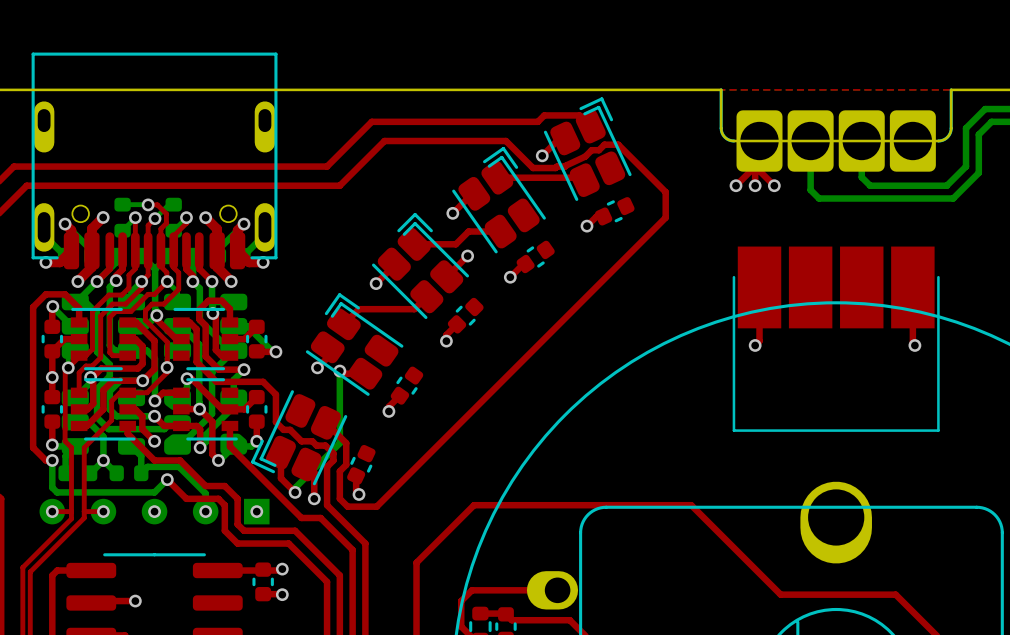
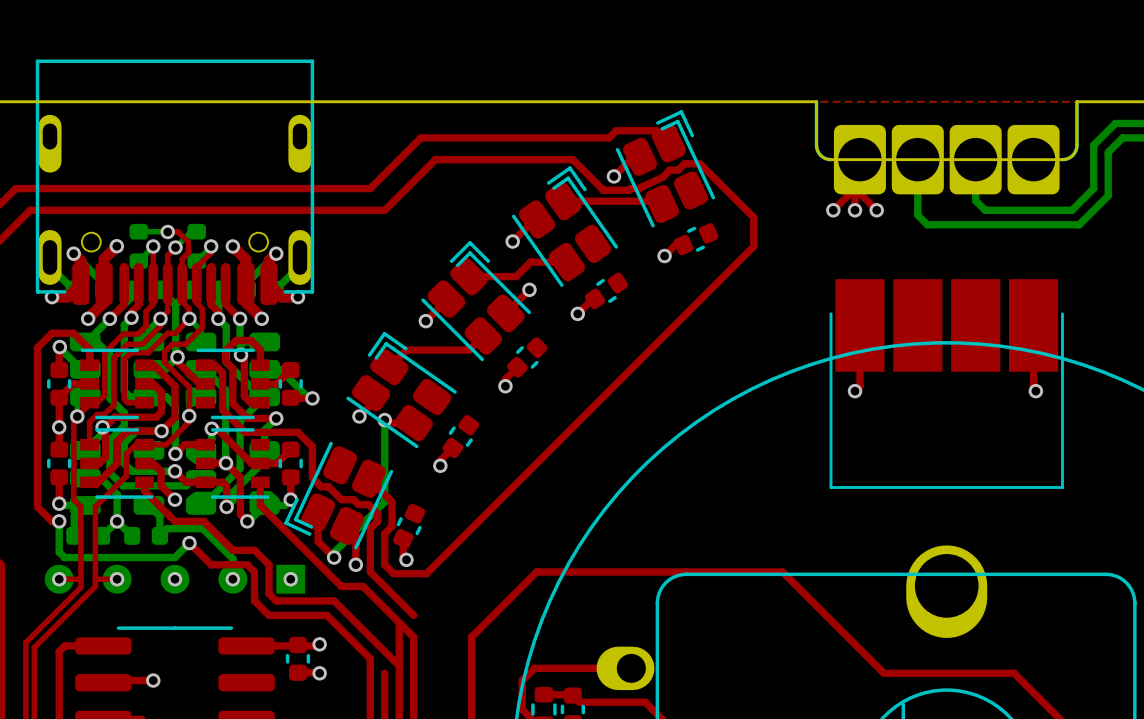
top track: (365, 543) (365, 562) -> (399, 622) (413, 637)
top track: (339, 575) (339, 594) -> (384, 651) (399, 666)

